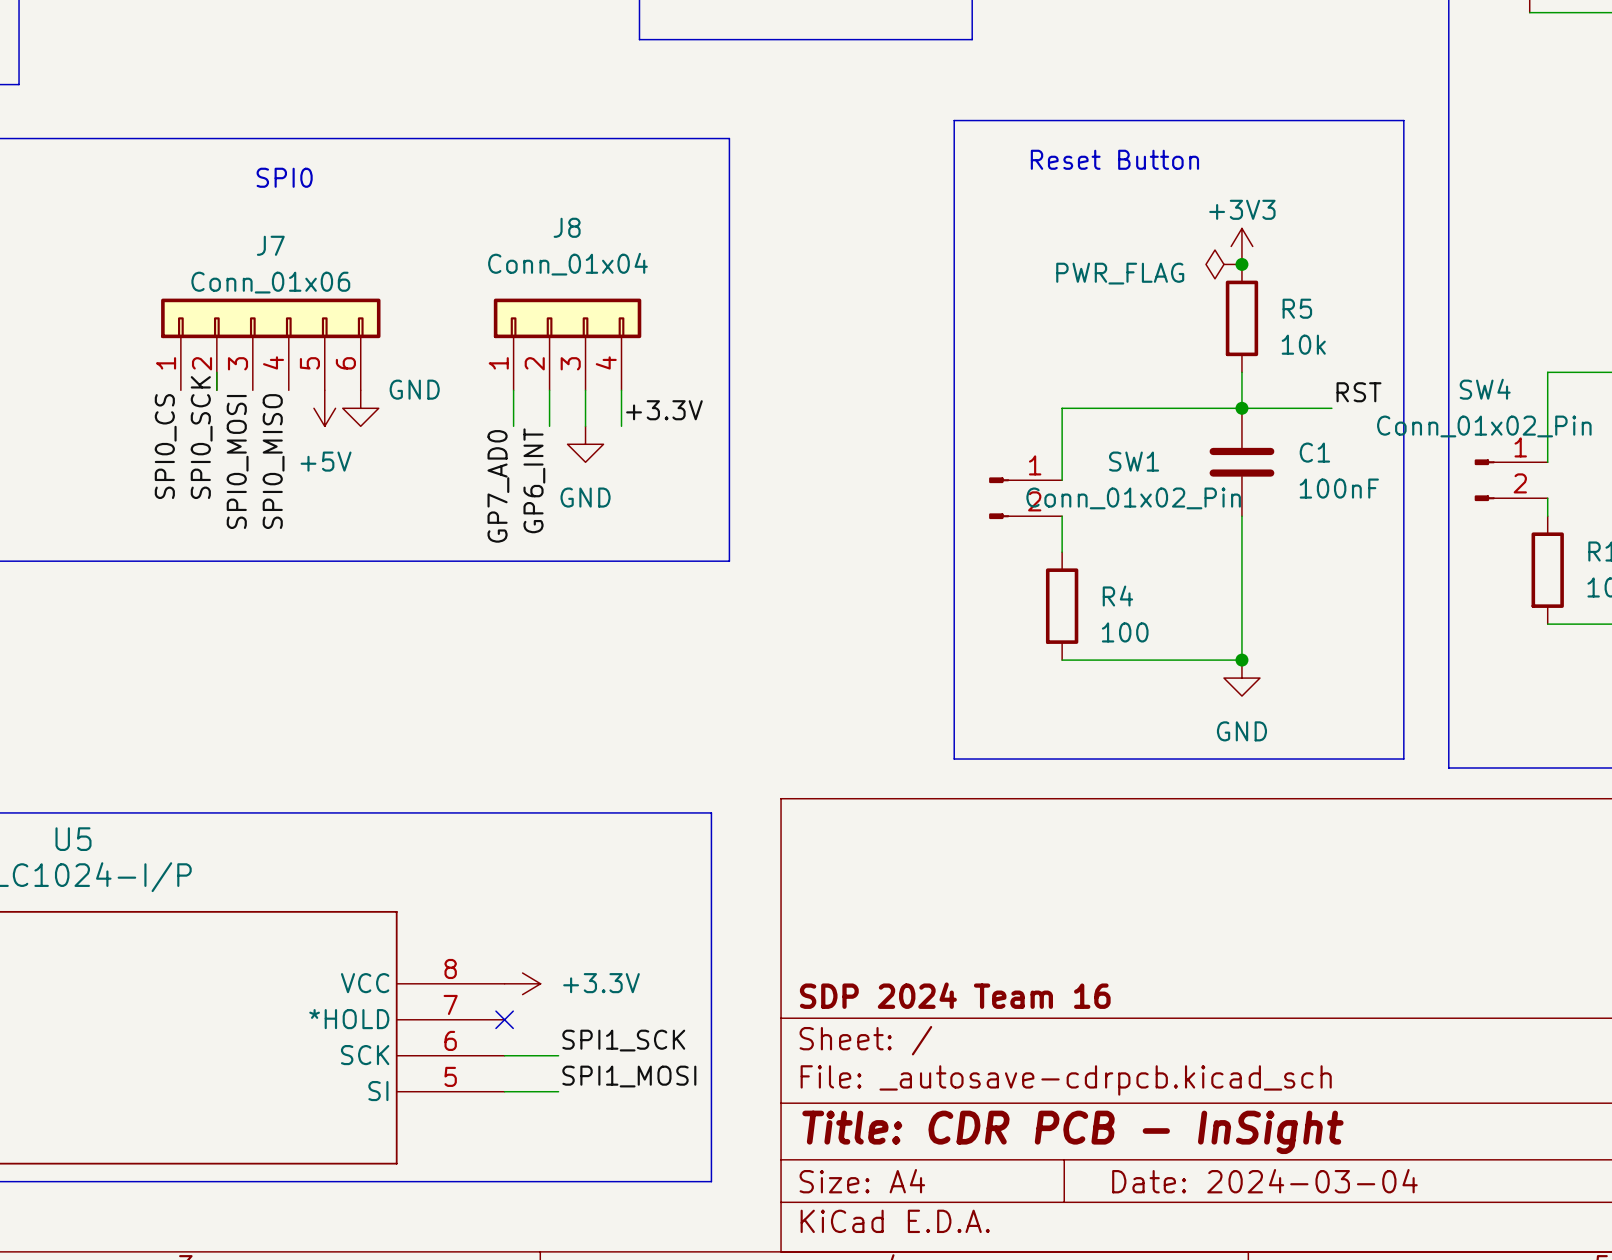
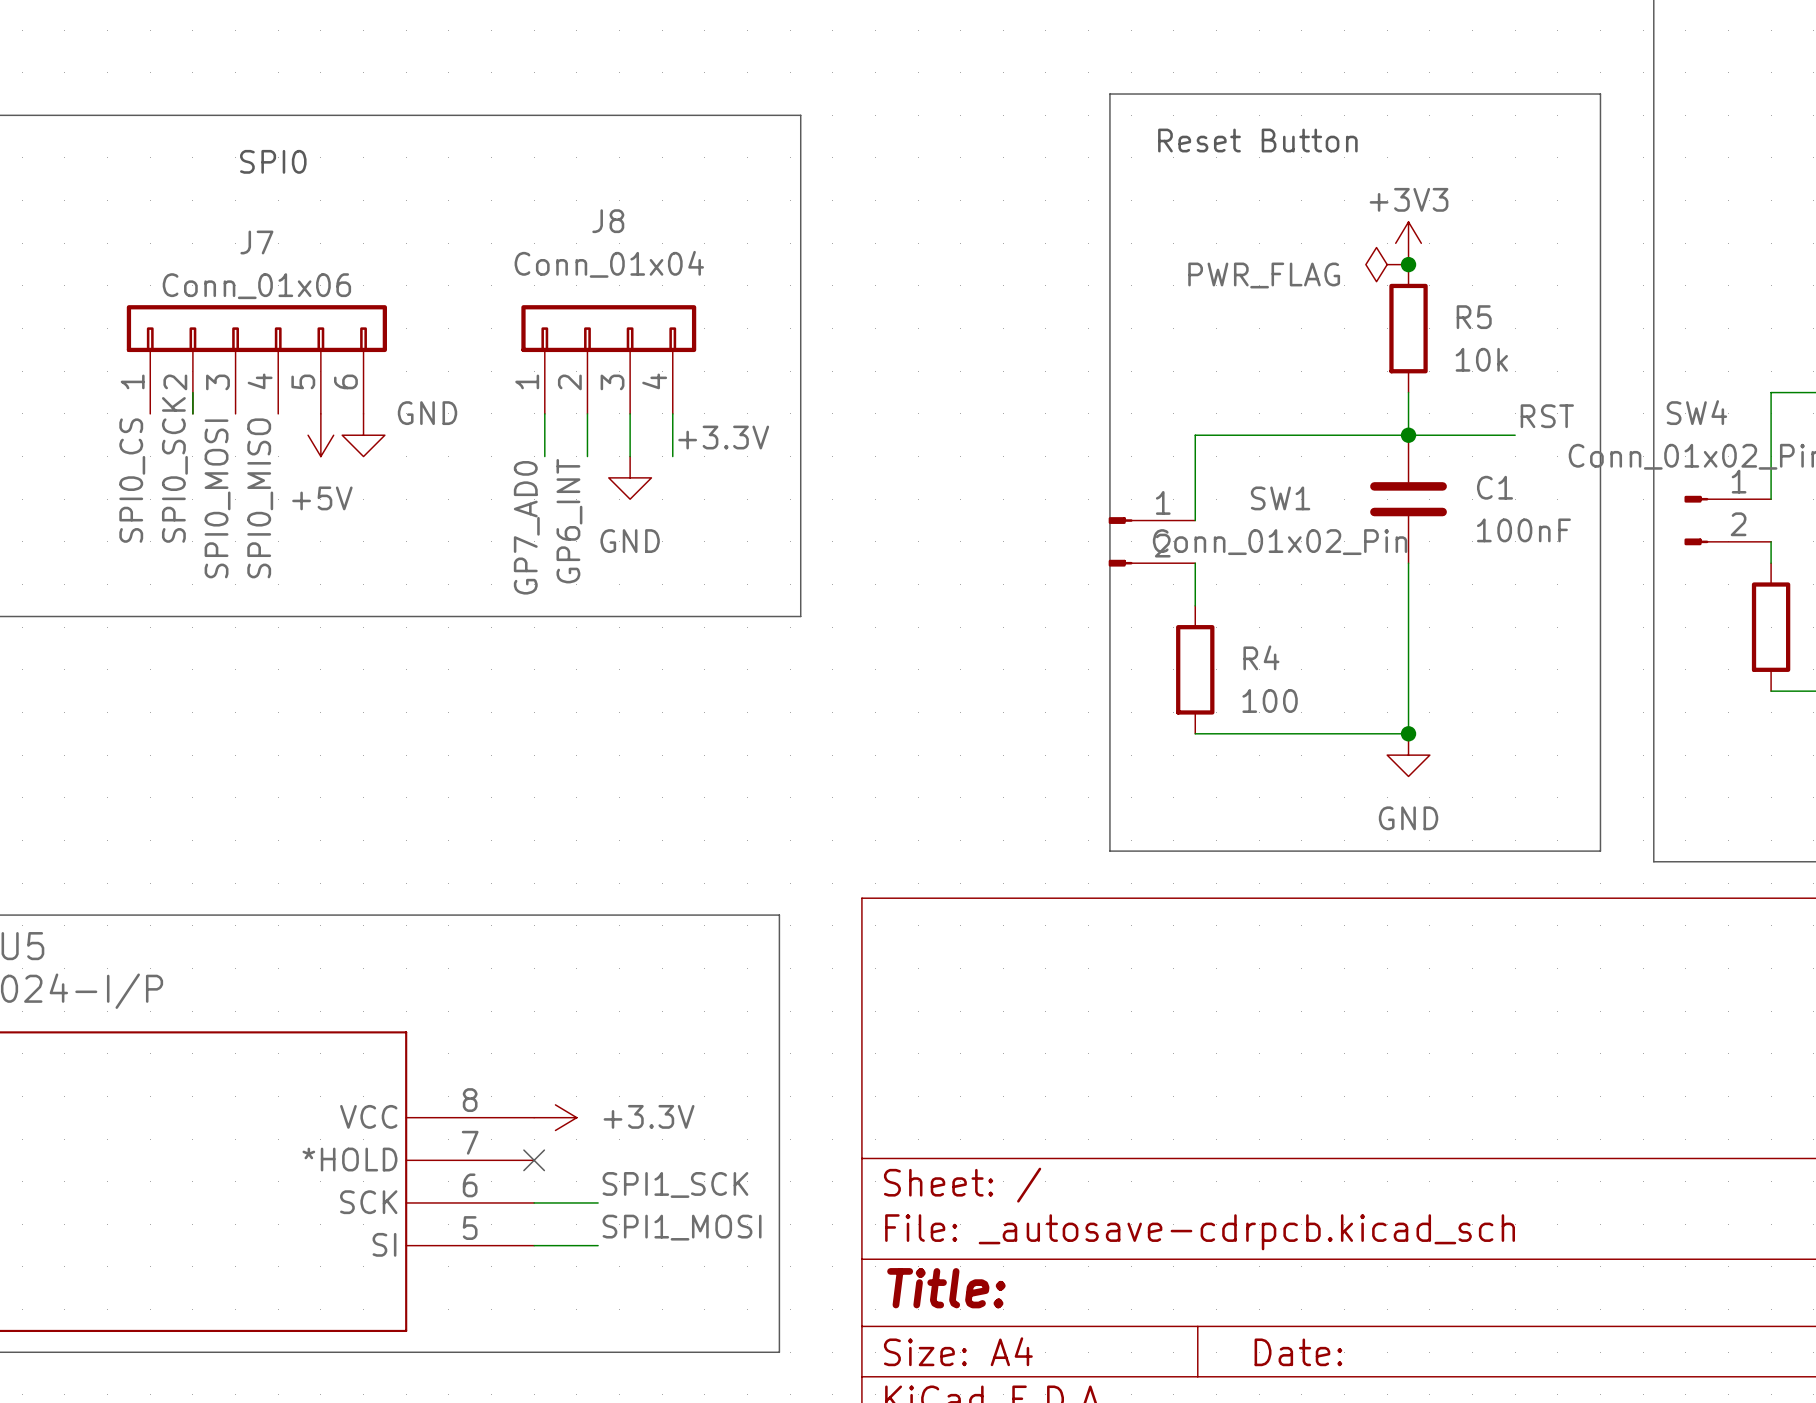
line: (990, 120) (954, 120) (954, 759) (990, 759) -> (1109, 94) (1109, 851)
title block: SDP 2024 Team 16 (955, 995) -> none
title block: Title: CDR PCB - InSight (1072, 1132) -> Title: (946, 1288)
title block: Date: 2024-03-04 (1264, 1181) -> Date: (1298, 1352)

